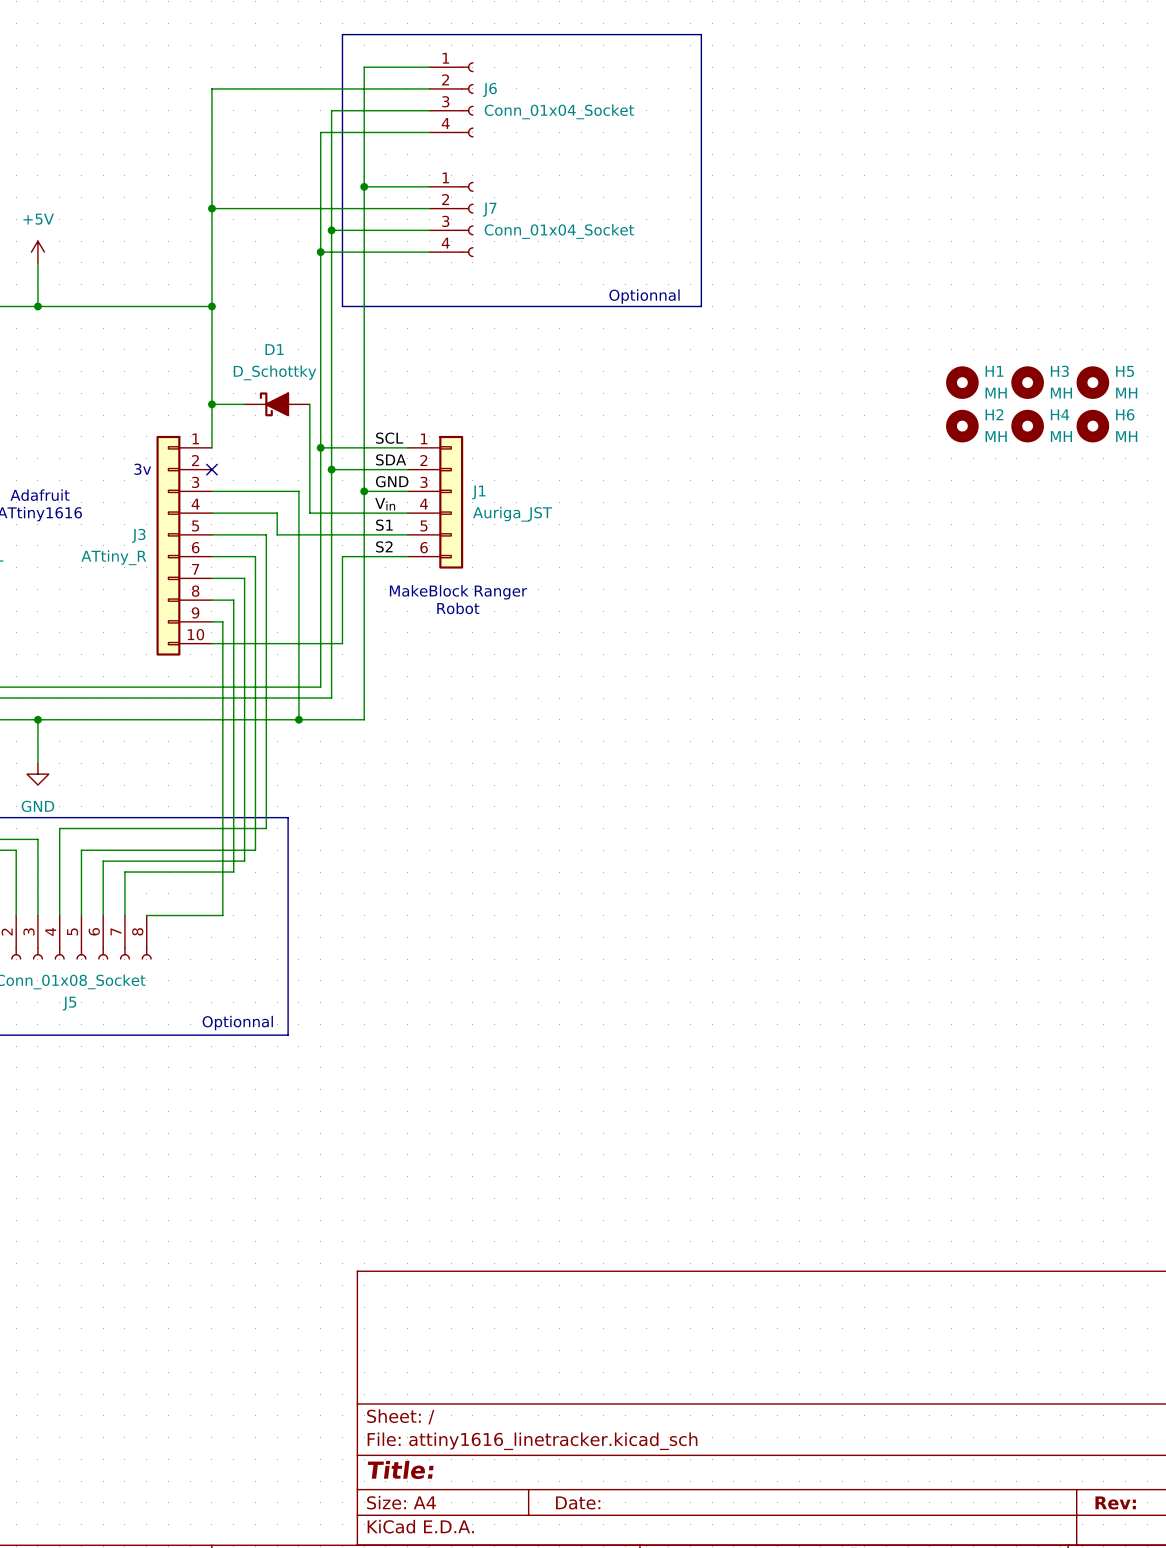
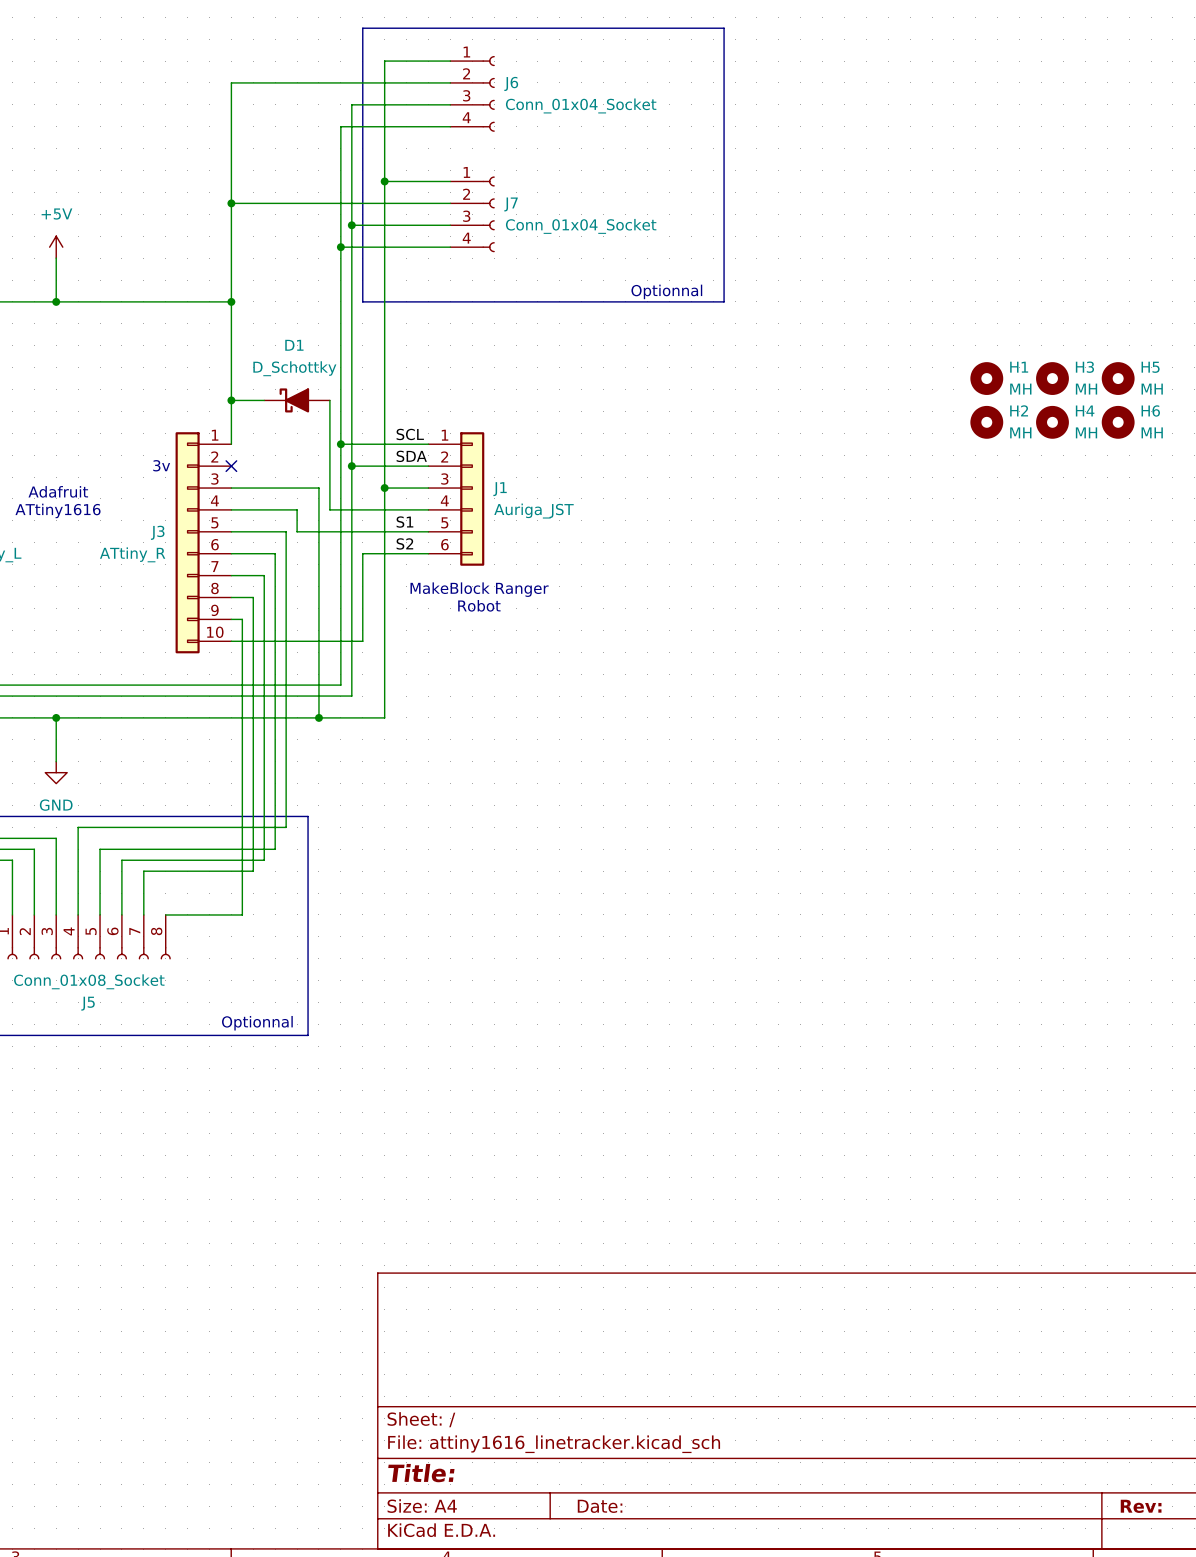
label: GND (392, 481) -> none
label: Vin (385, 504) -> none

